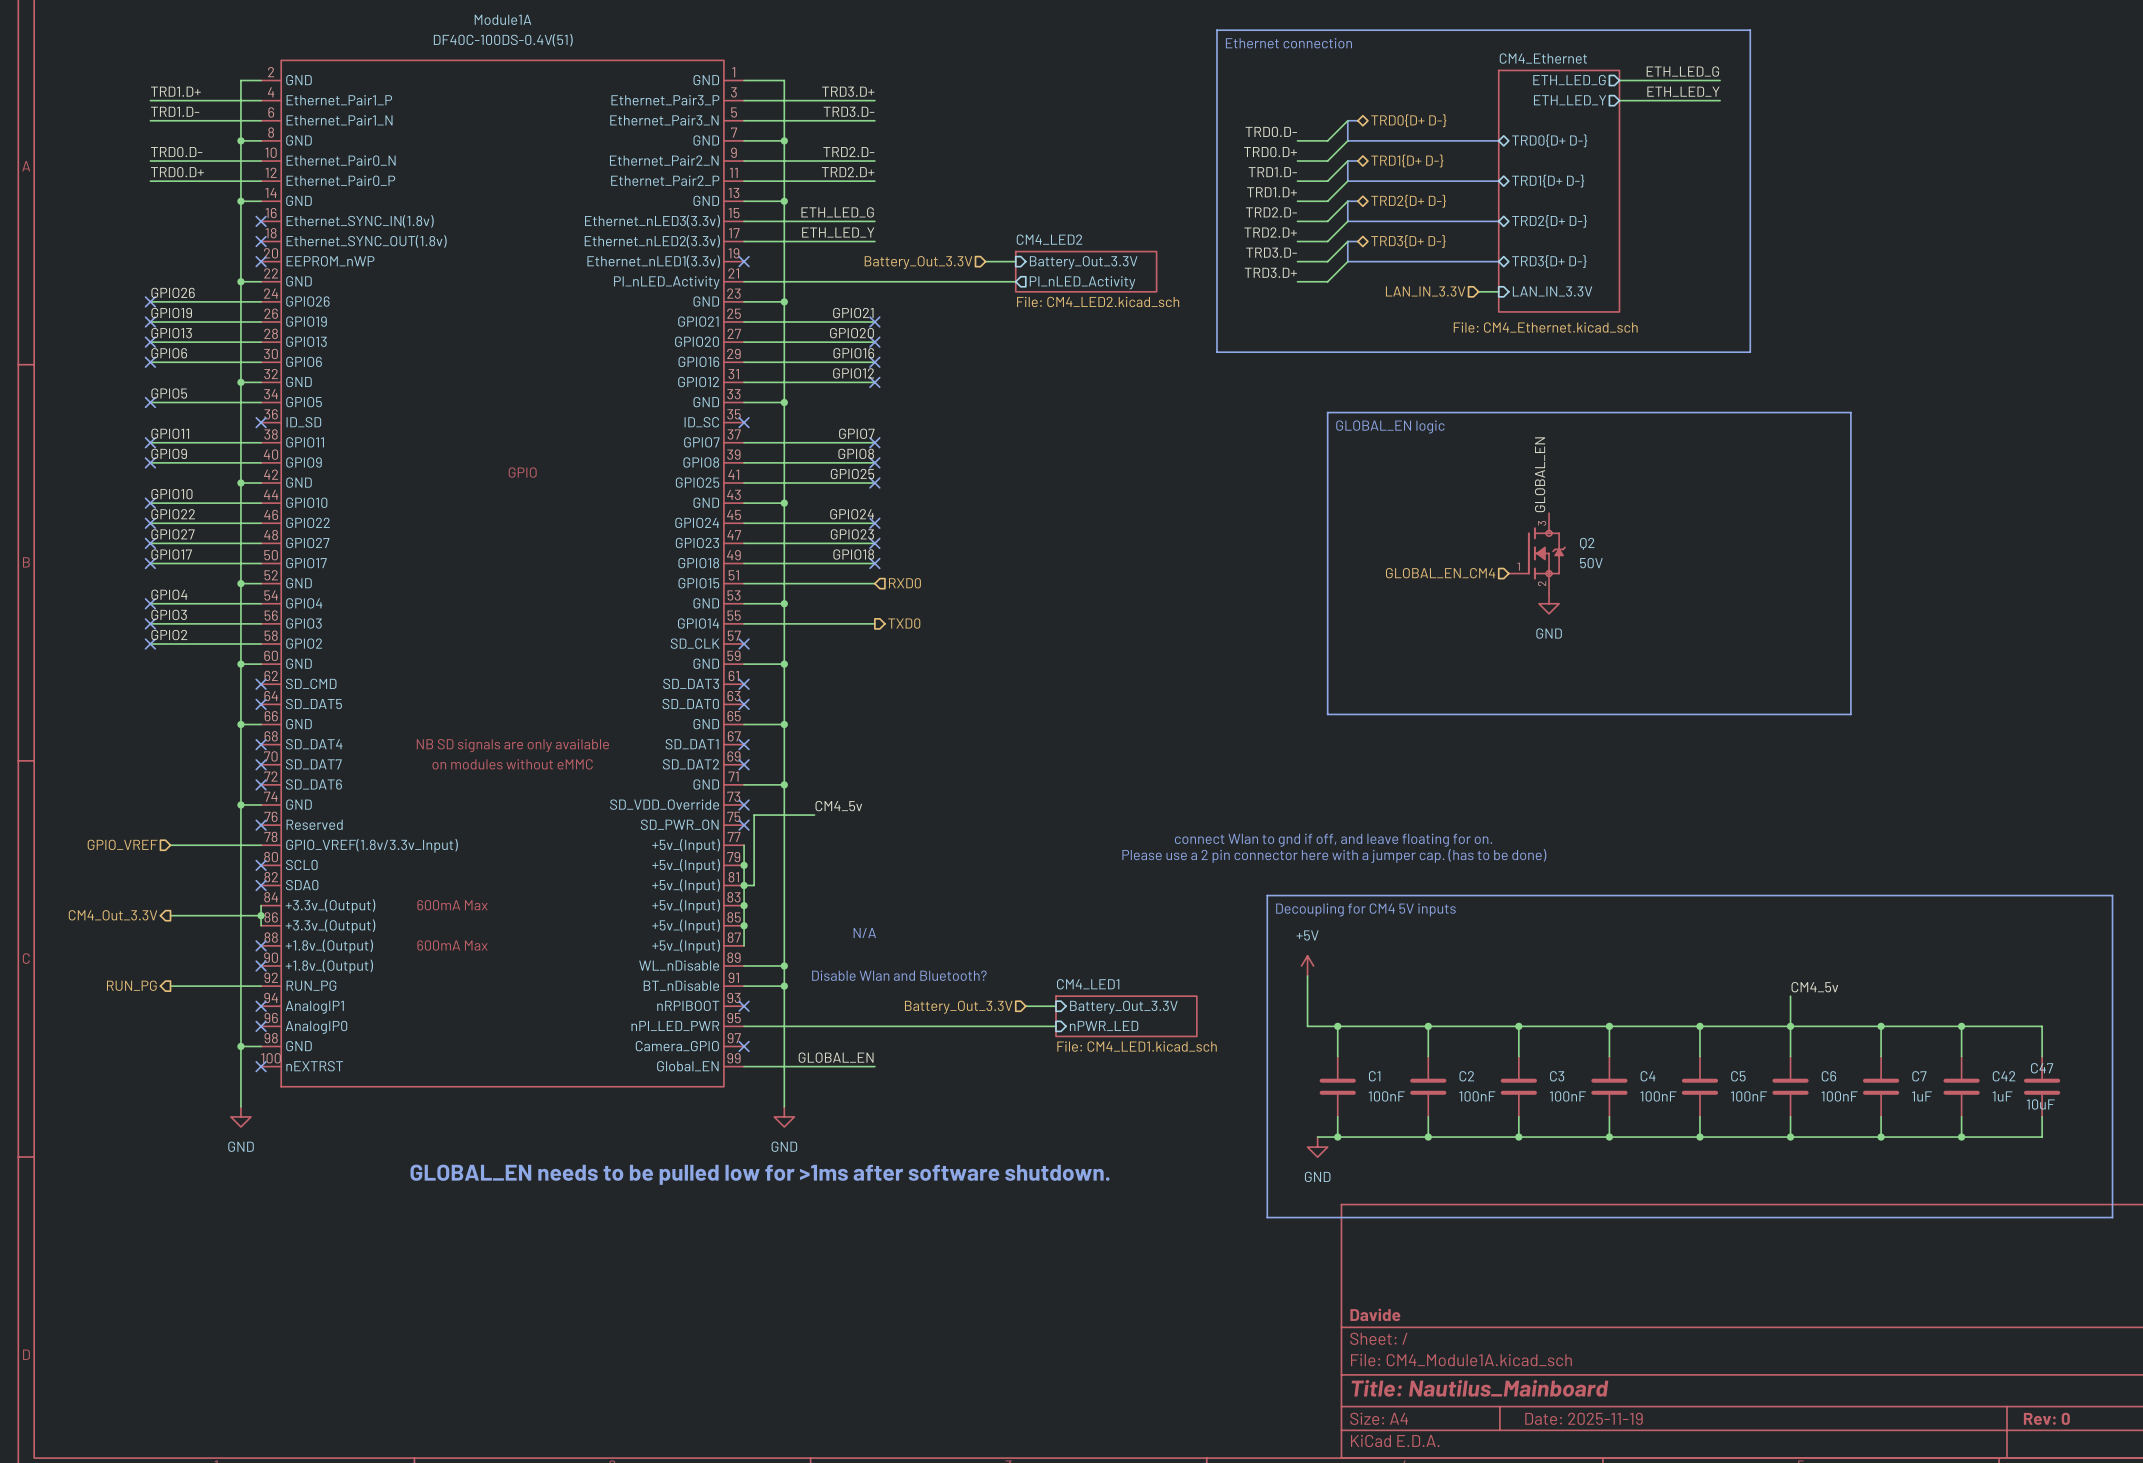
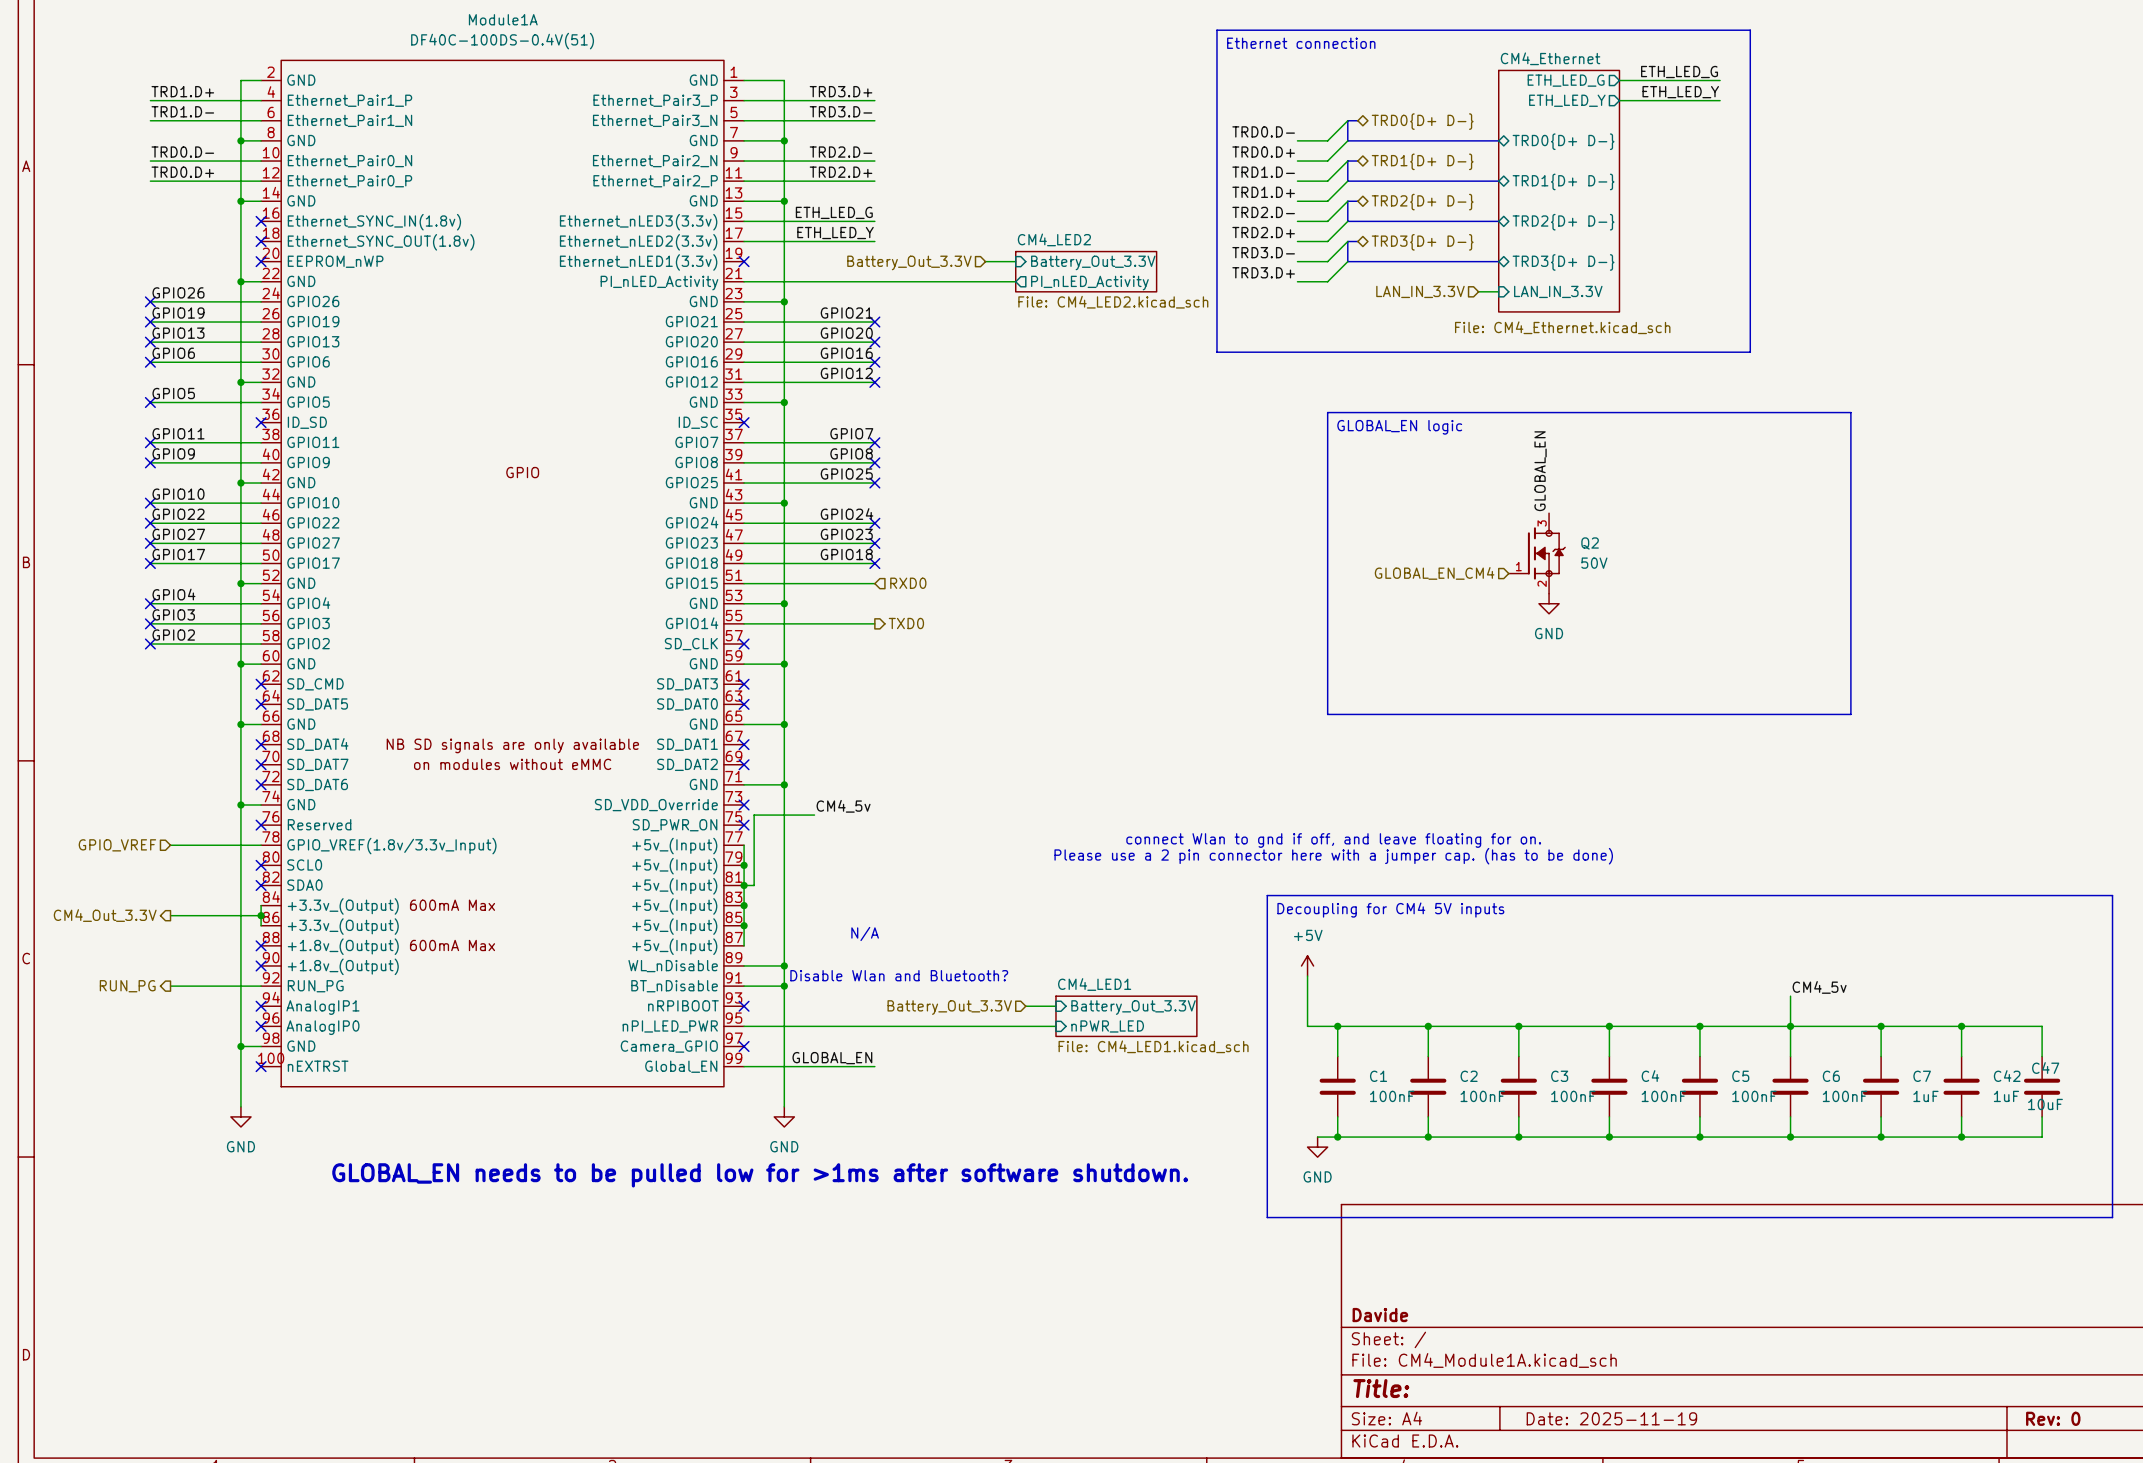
title block: Title: Nautilus_Mainboard (1479, 1388) -> Title: (1381, 1388)

